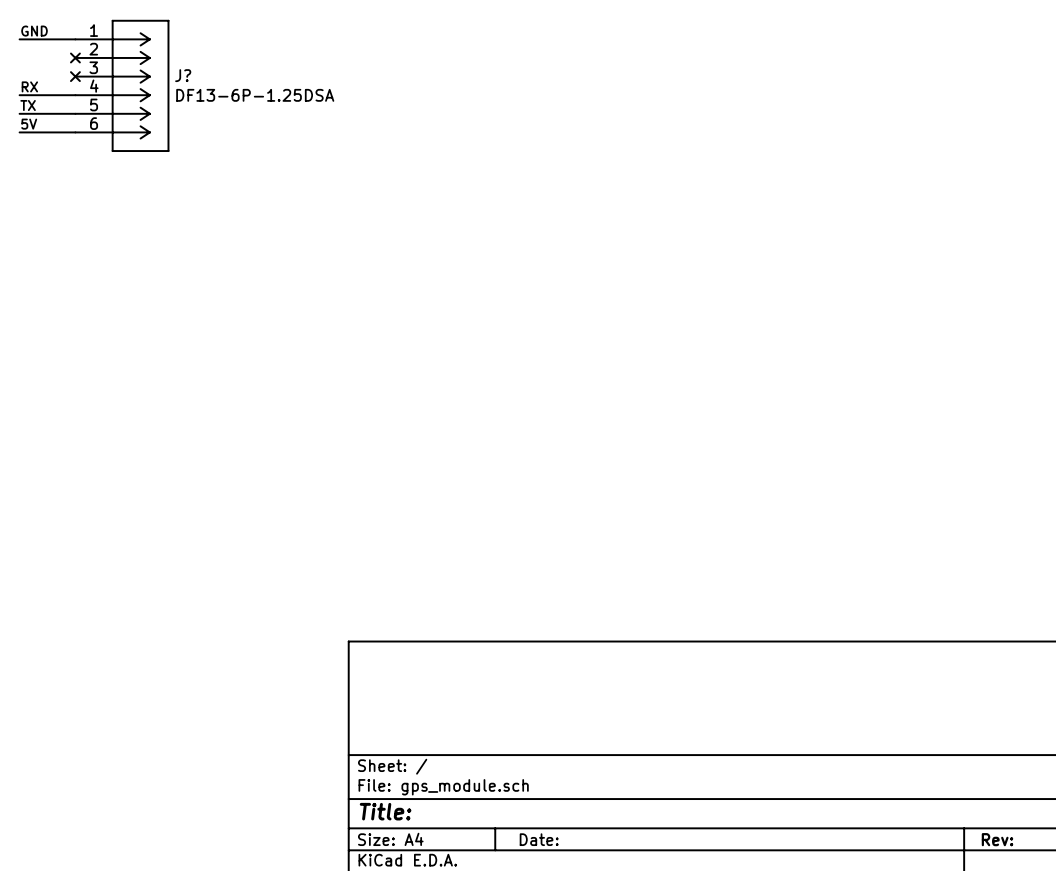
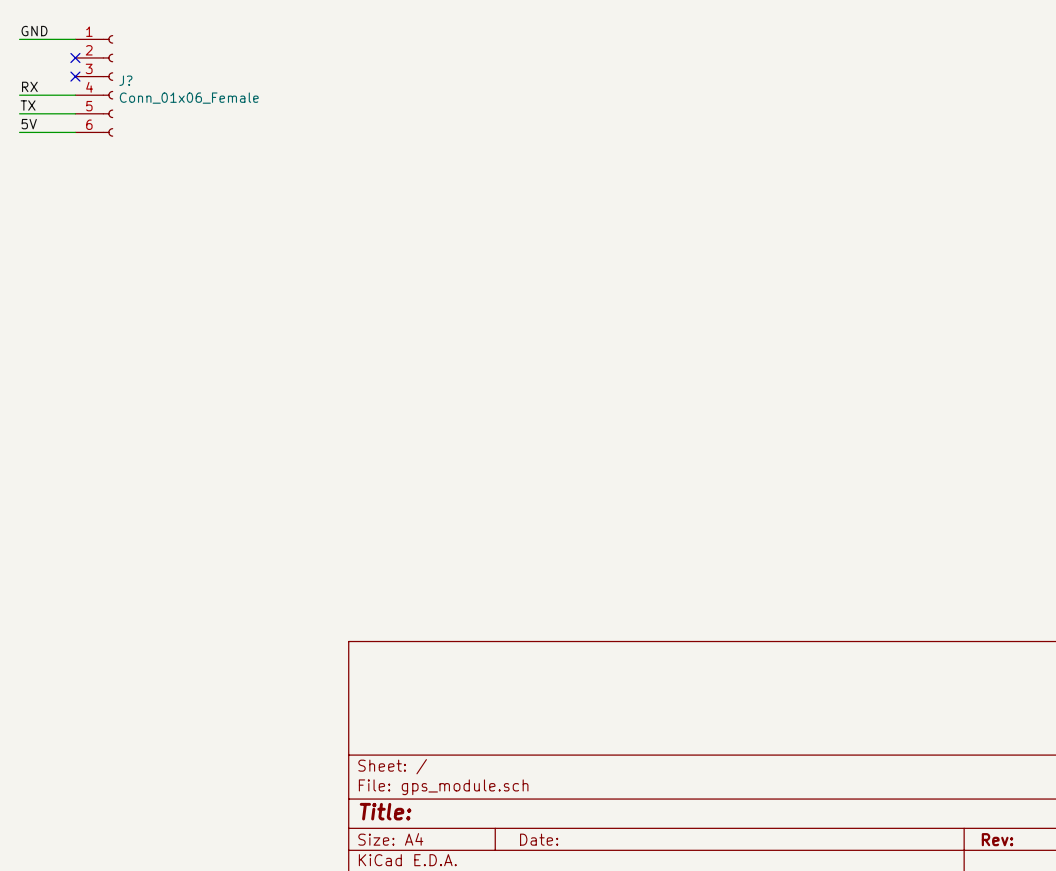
J?: none -> Conn_01x06_Female (94, 85)
J?: DF13-6P-1.25DSA (122, 85) -> none

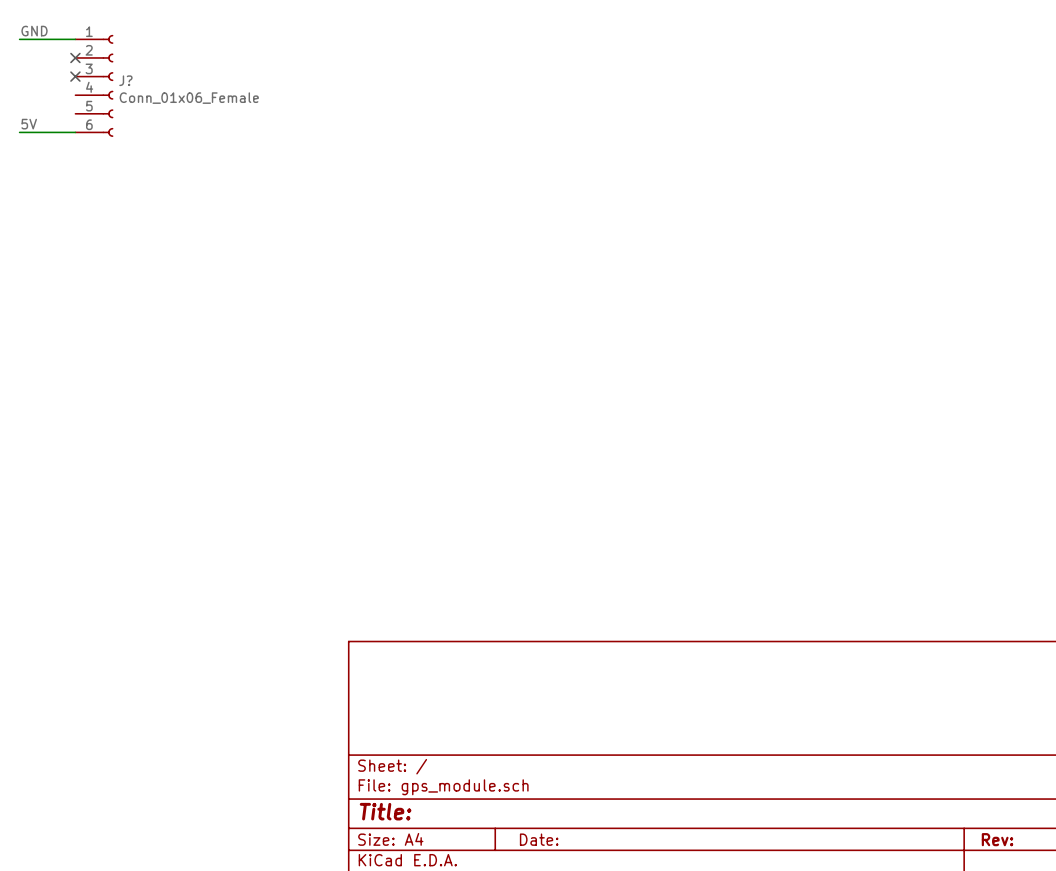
label: RX (29, 86) -> none
wire: (19, 95) (75, 95) -> none
label: TX (28, 105) -> none
wire: (19, 113) (75, 113) -> none

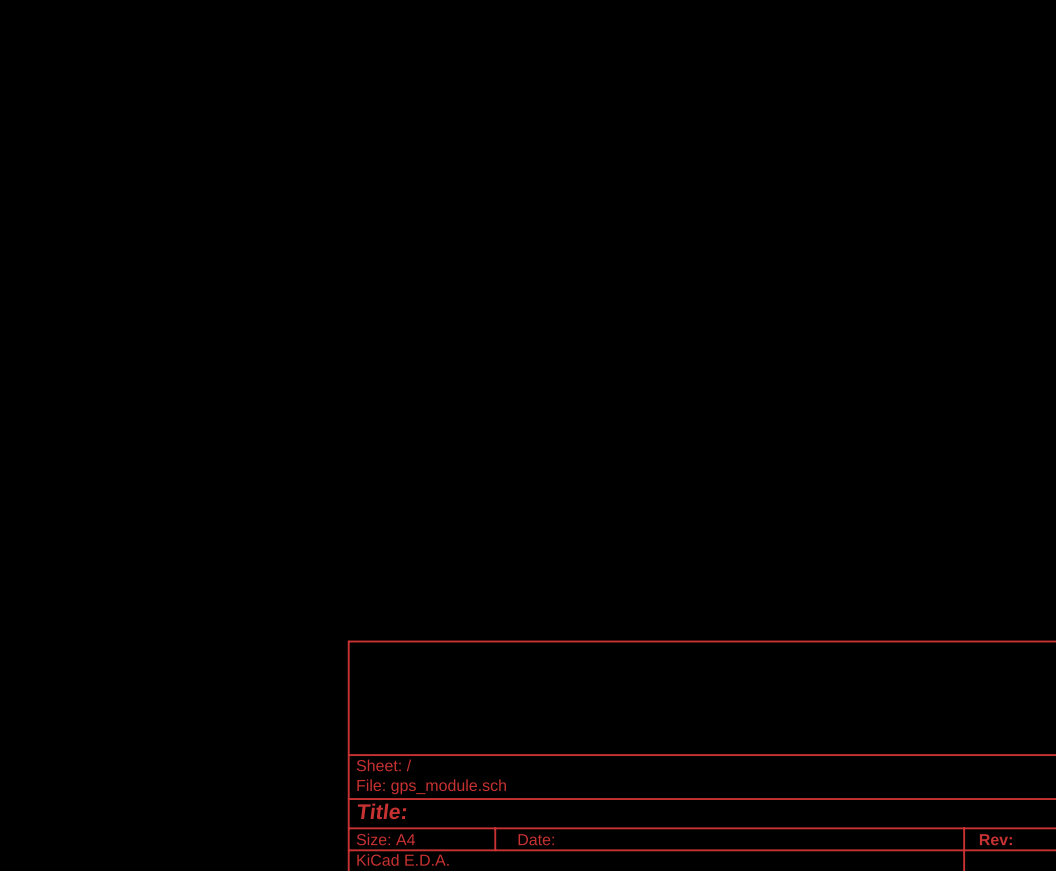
label: GND (34, 31) -> none
wire: (19, 39) (75, 39) -> none
no-connect mark: (75, 57) -> none
no-connect mark: (75, 76) -> none
J?: Conn_01x06_Female (94, 85) -> none
label: 5V (29, 124) -> none
wire: (19, 132) (75, 132) -> none

